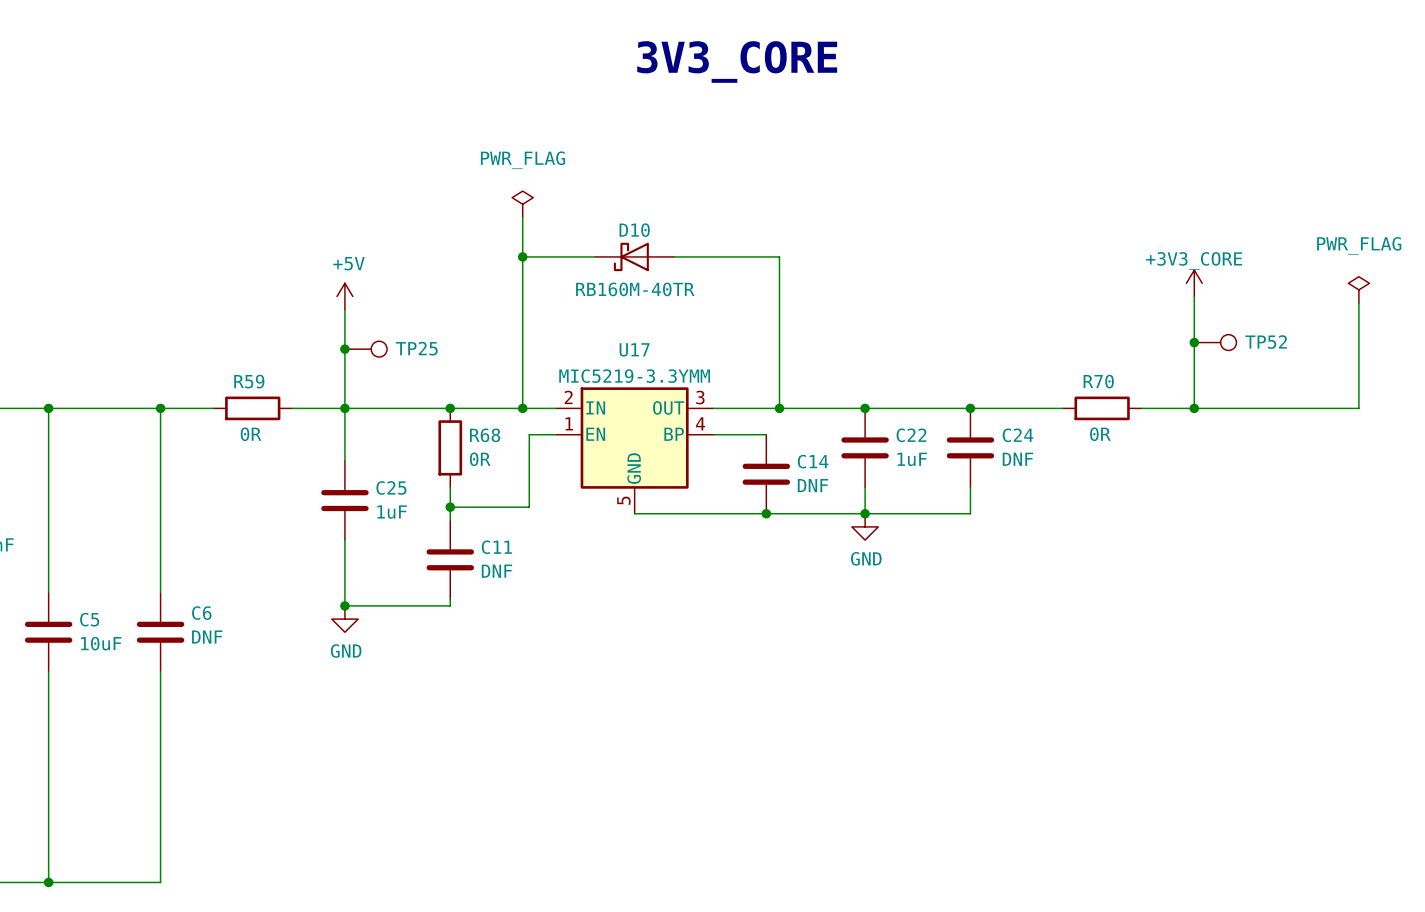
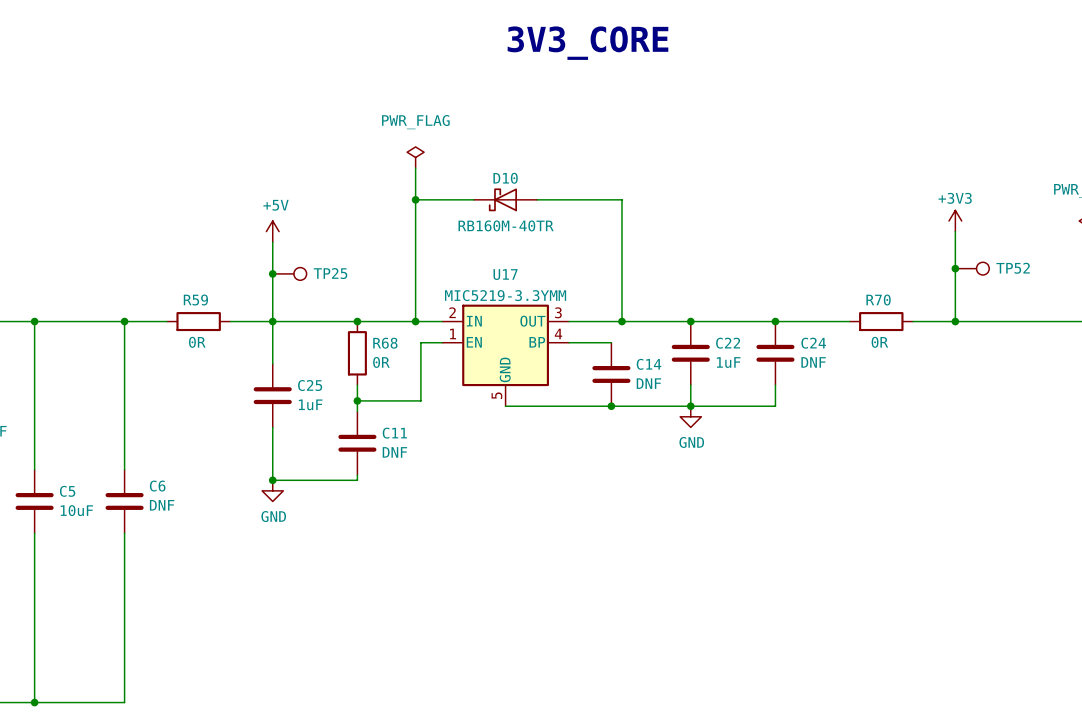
power symbol: +3V3_CORE (1194, 283) -> +3V3 (955, 221)

